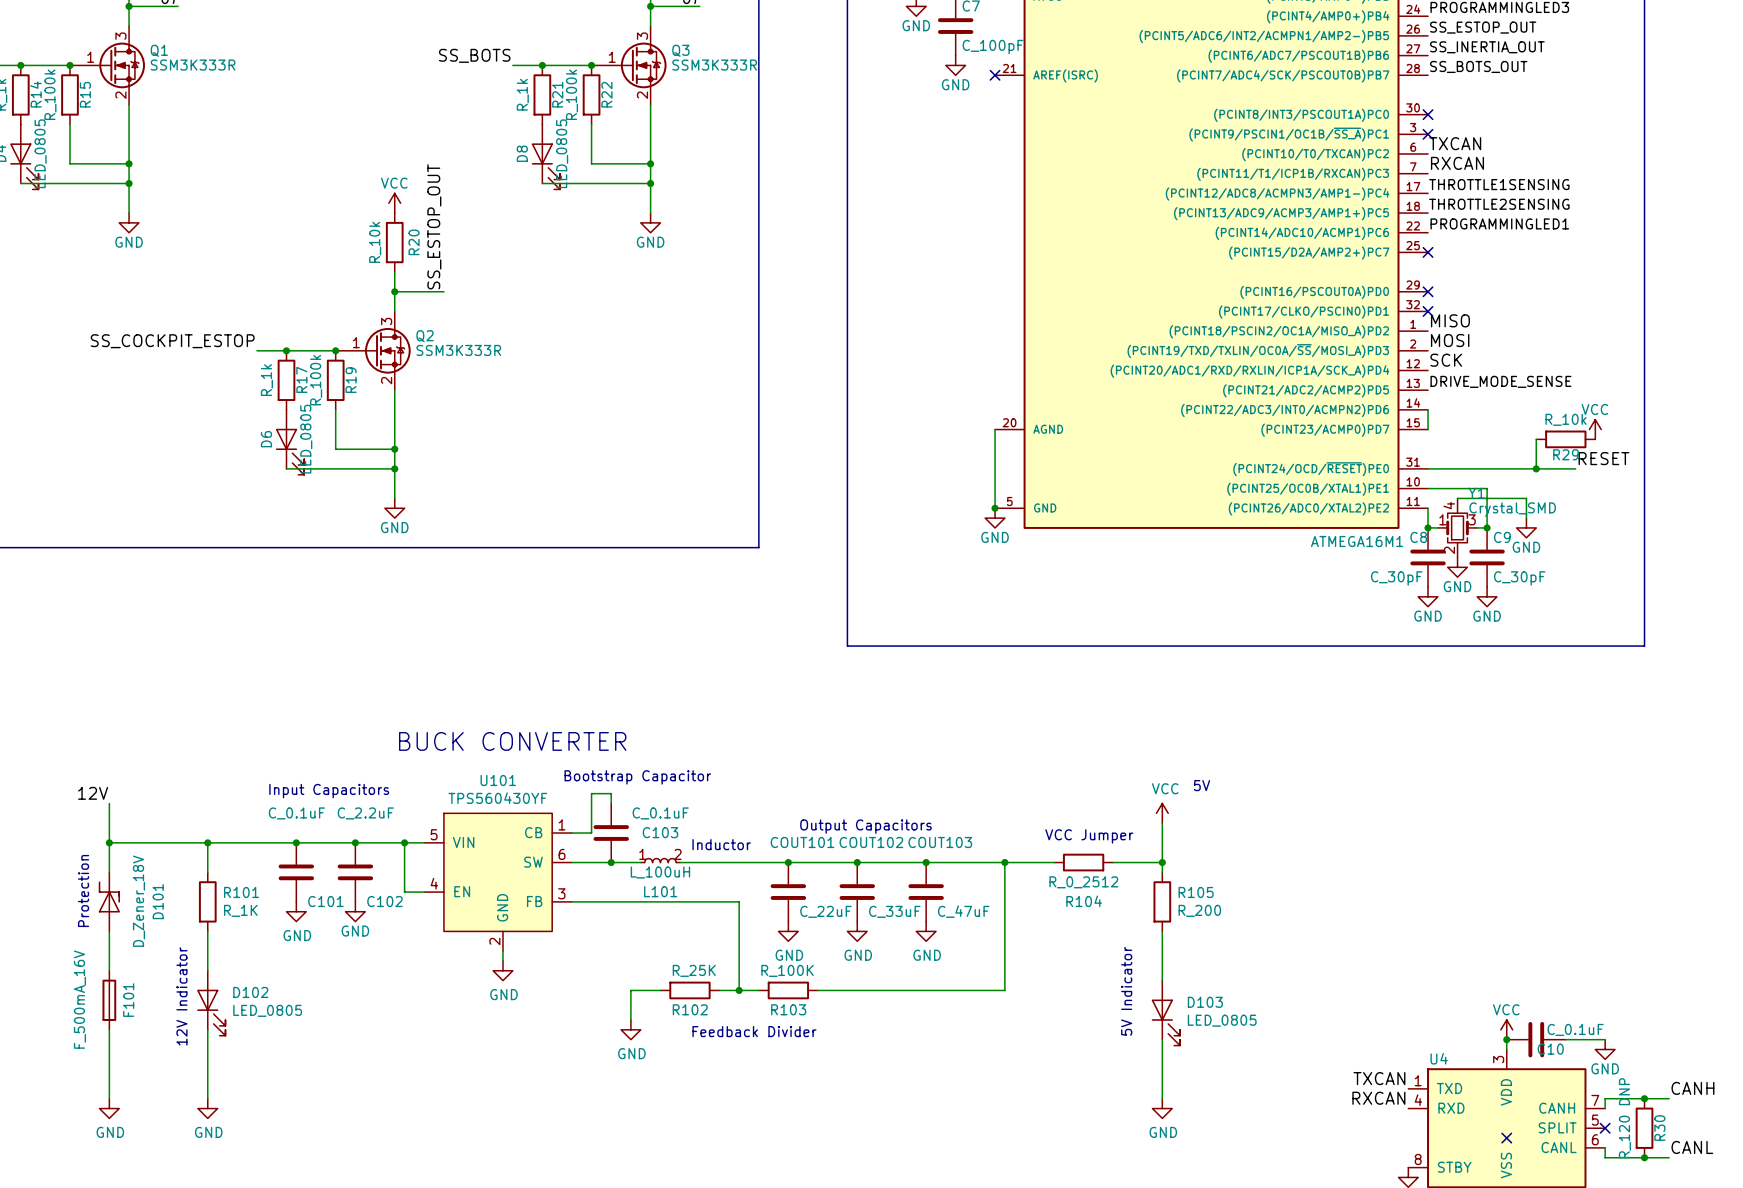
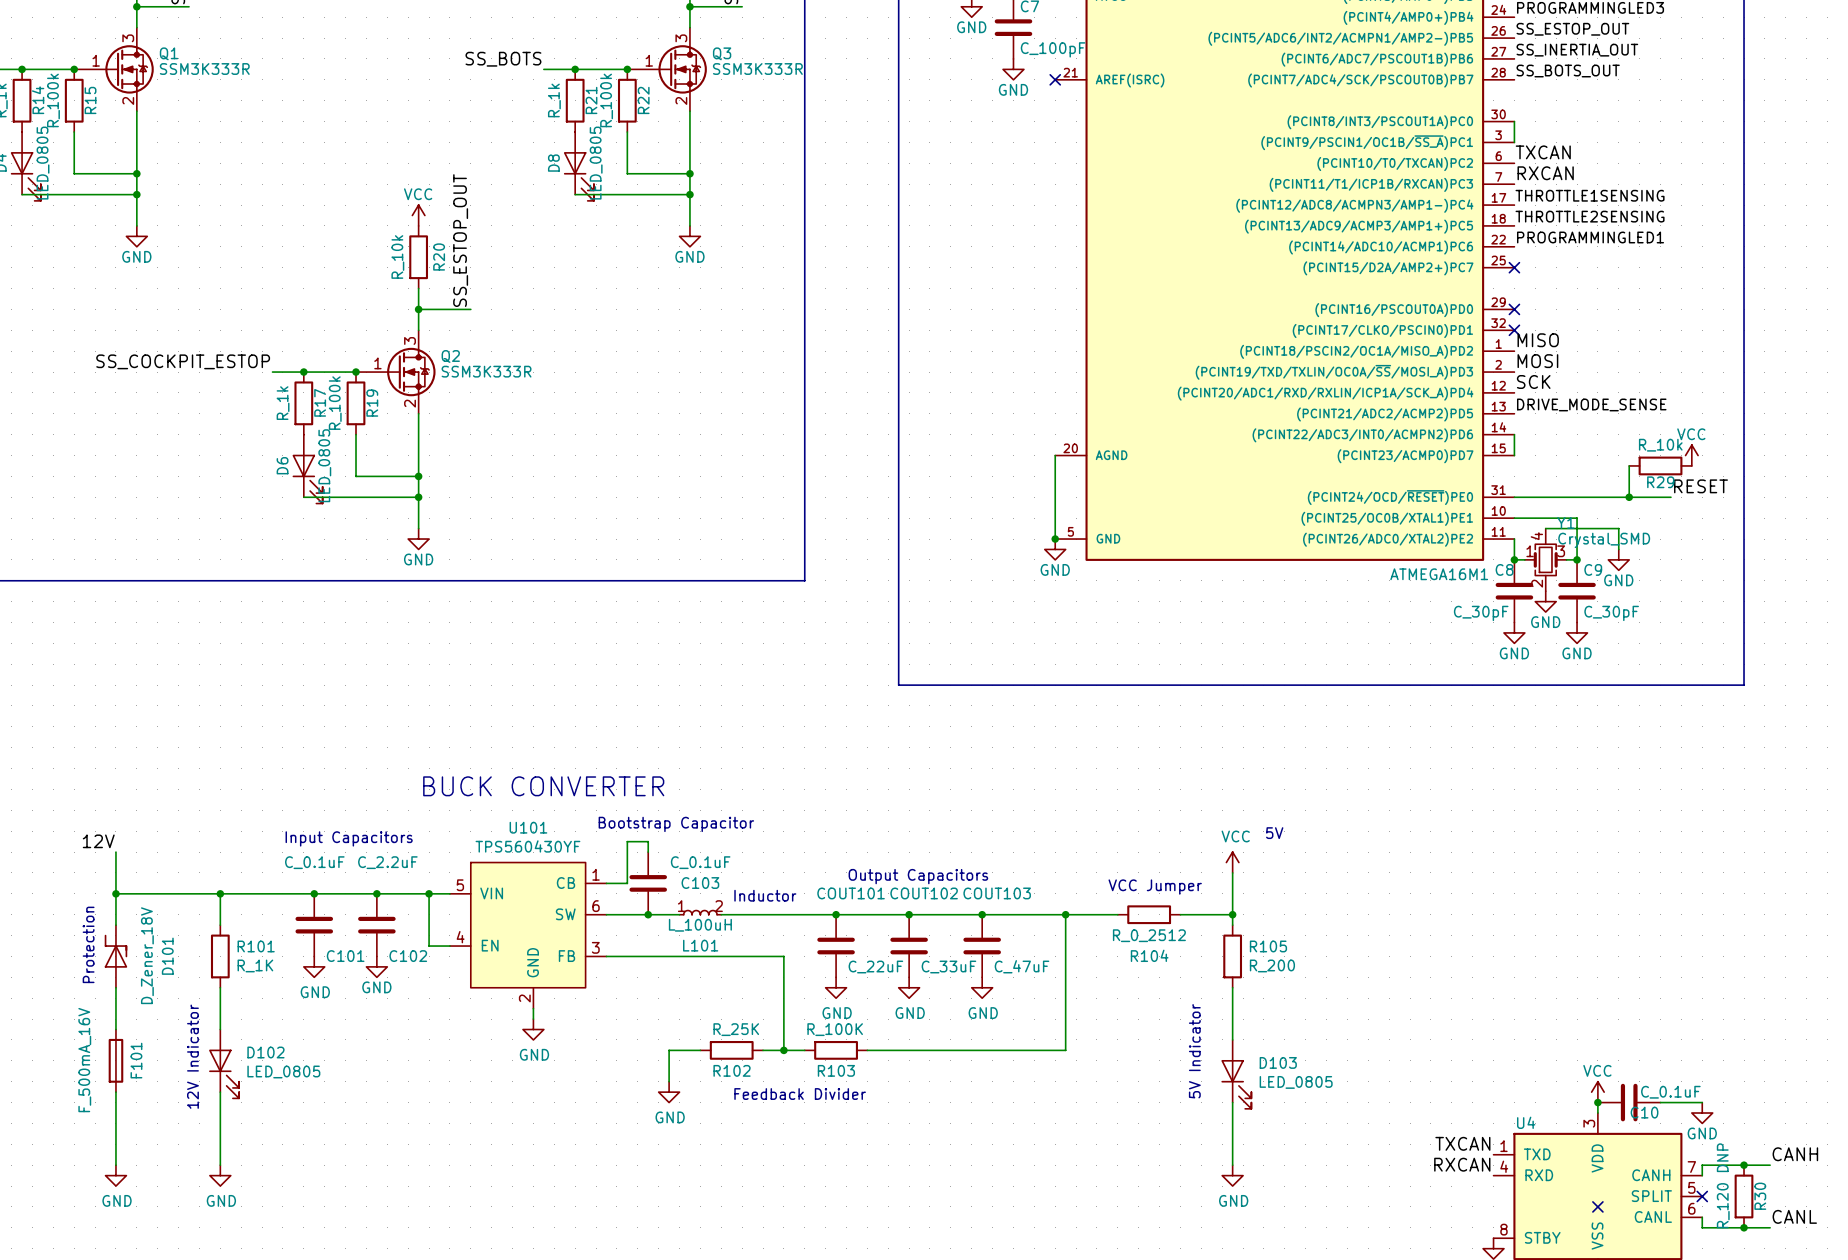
wire: none -> (1514, 121) (1514, 142)
no-connect mark: (1428, 114) -> none
no-connect mark: (1428, 134) -> none

